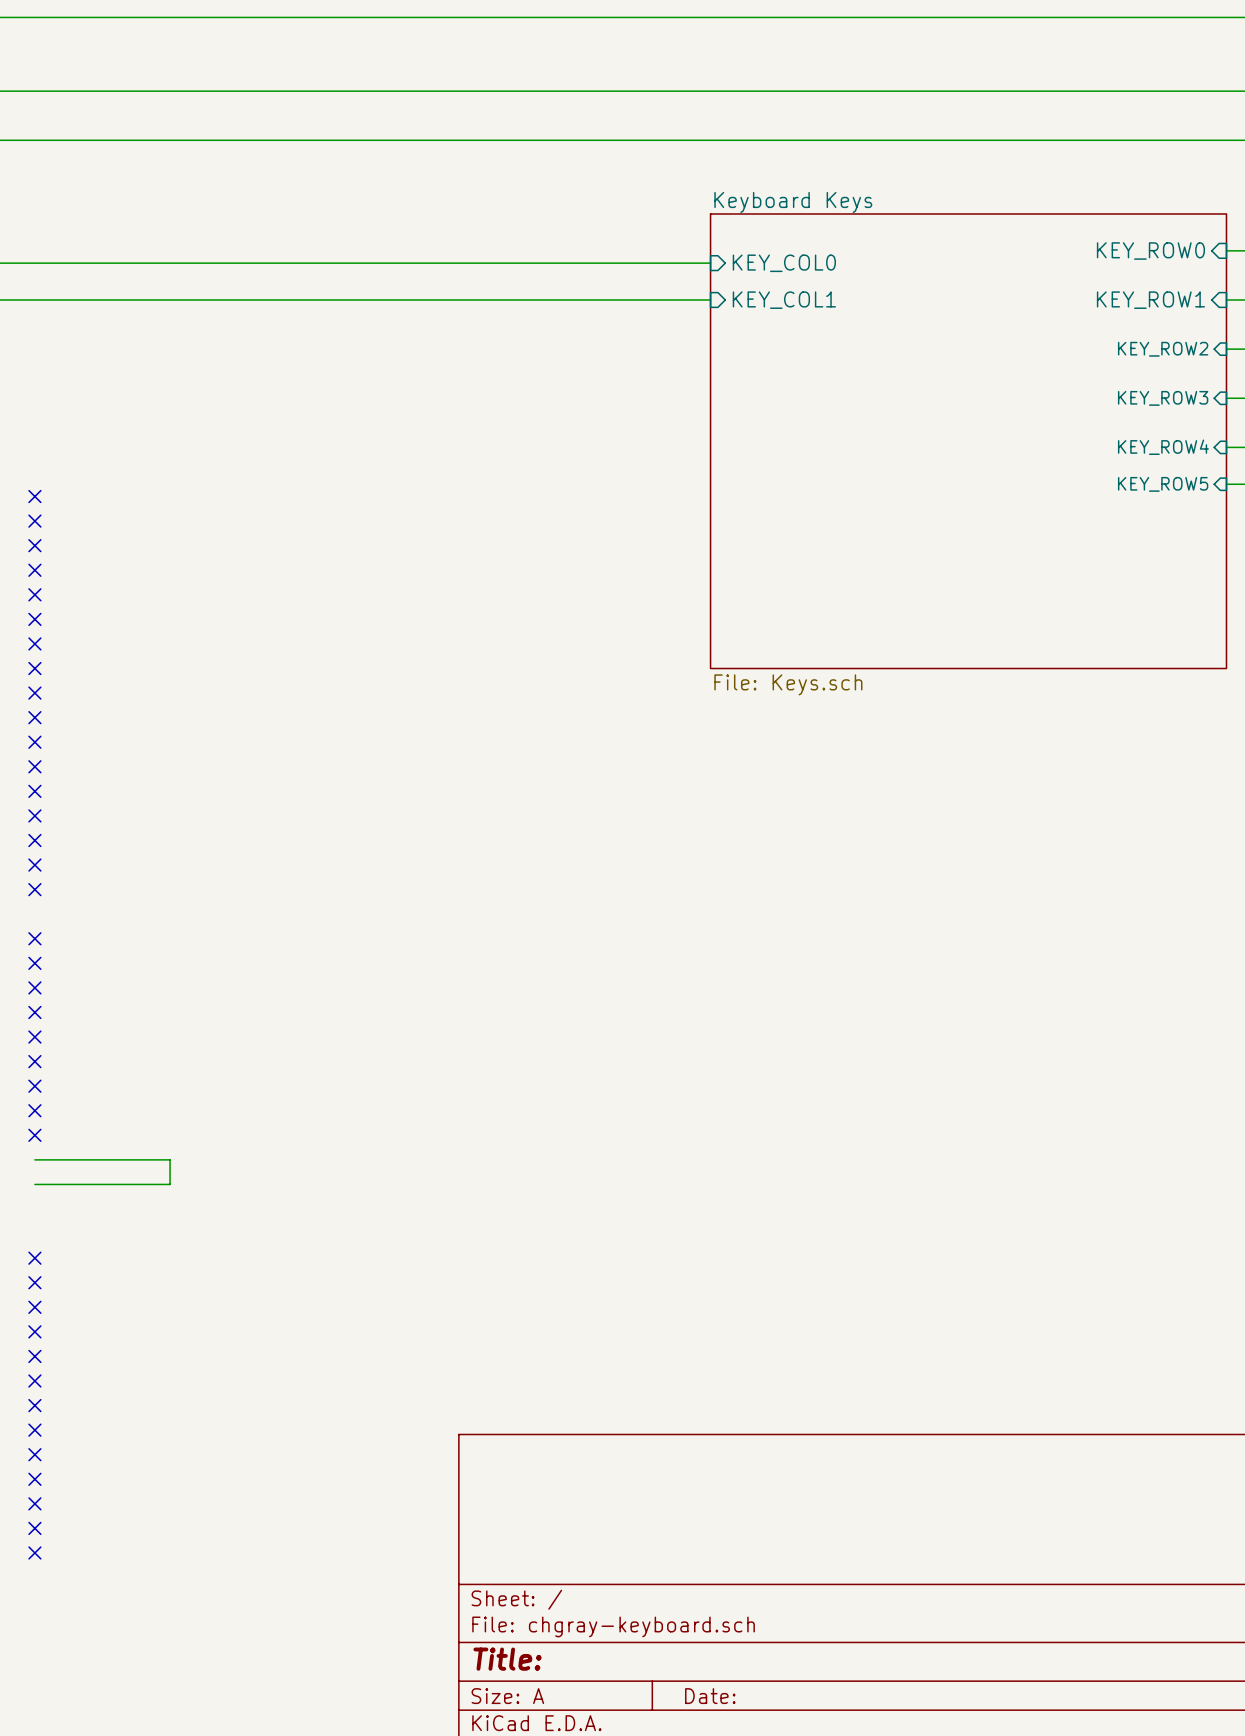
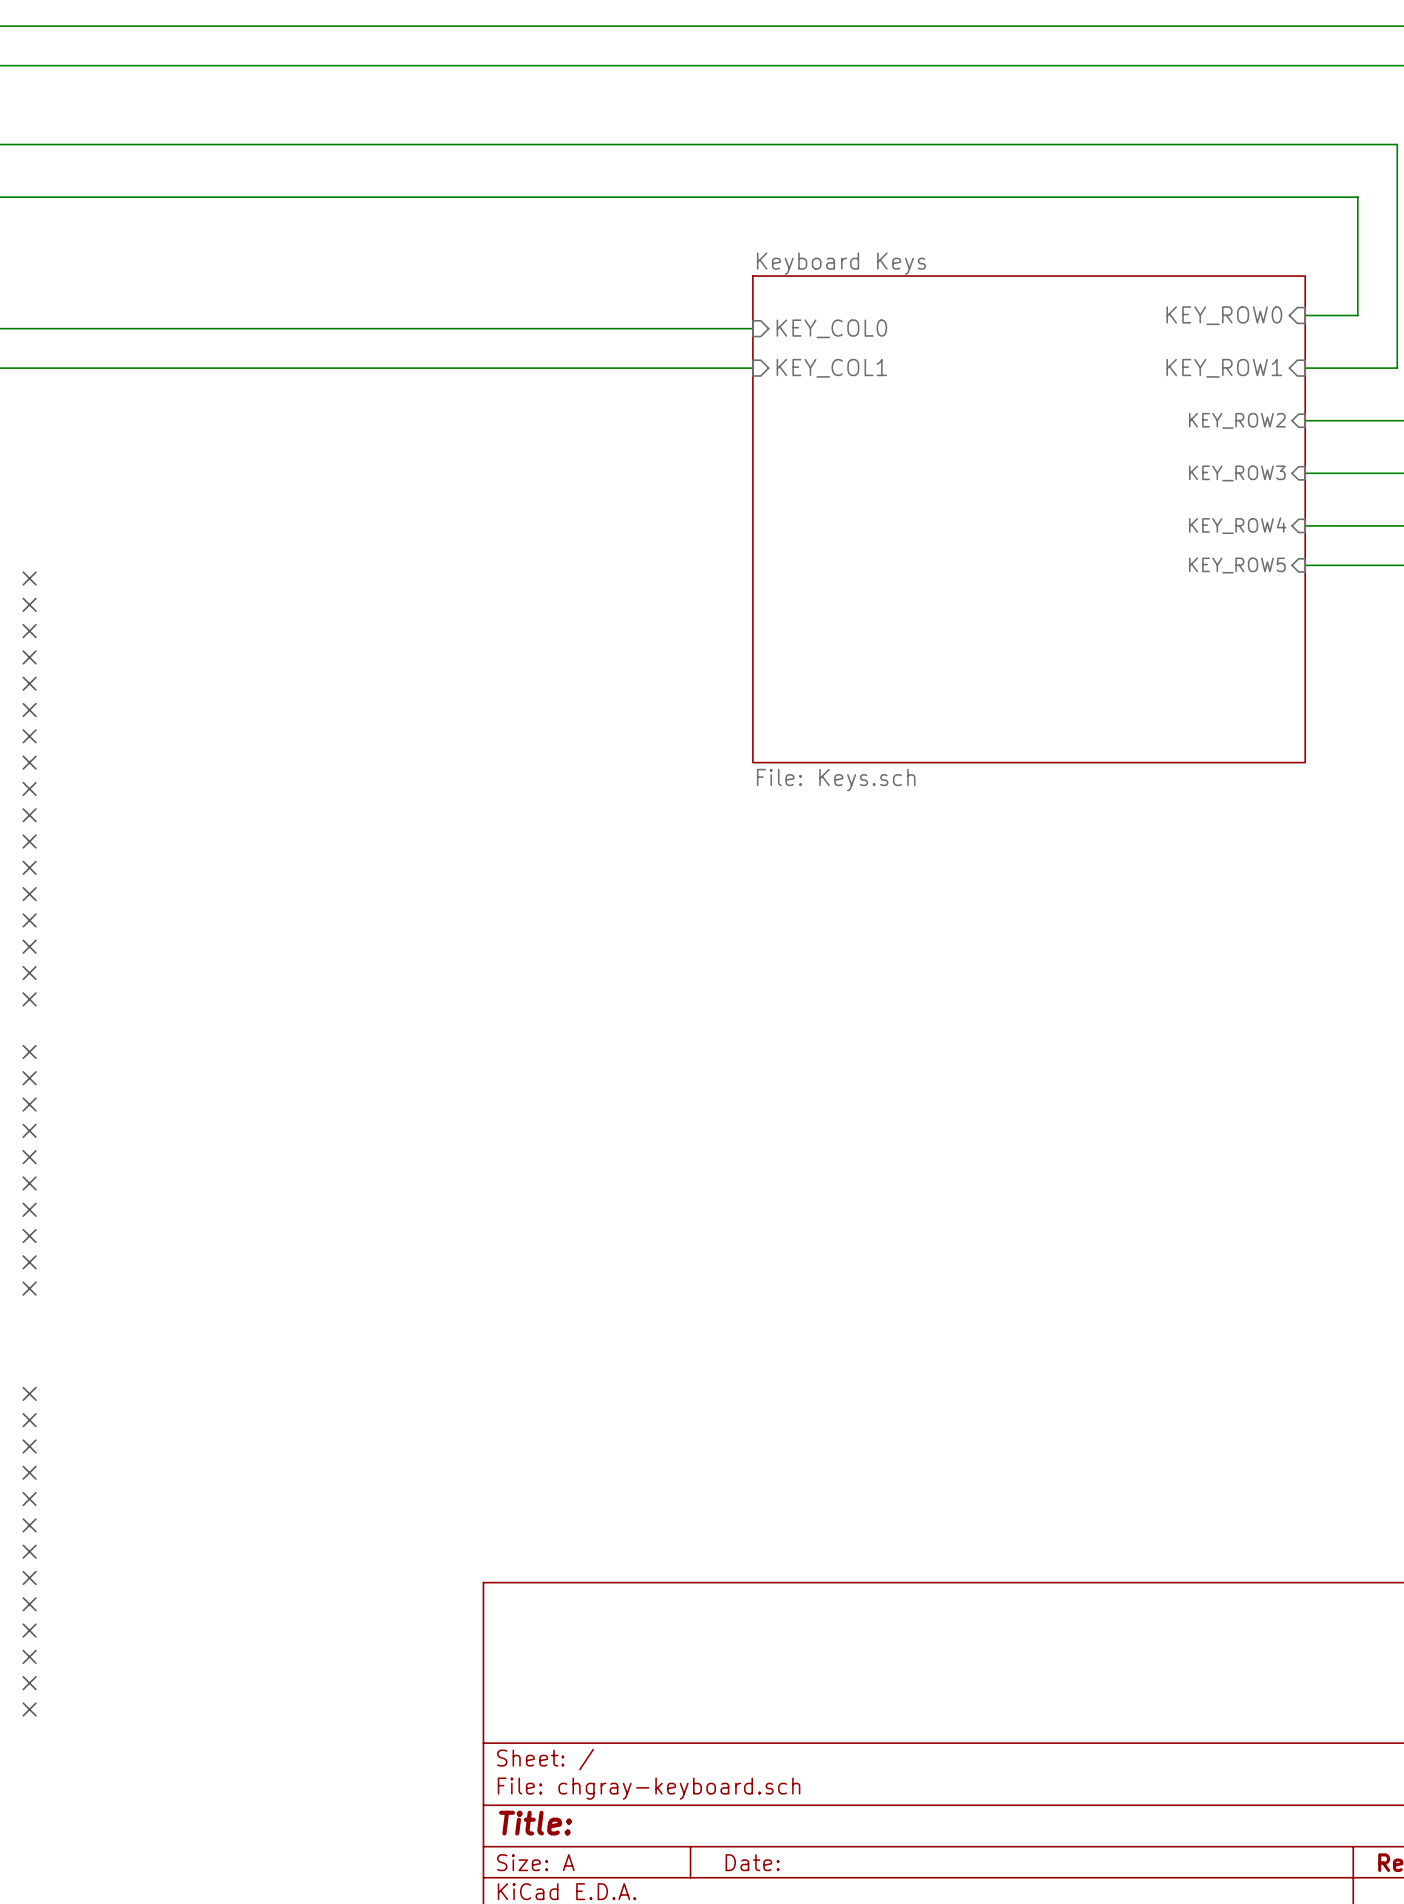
wire: (34, 1159) (170, 1159) (170, 1184) (34, 1184) -> none
no-connect mark: none -> (29, 1288)

